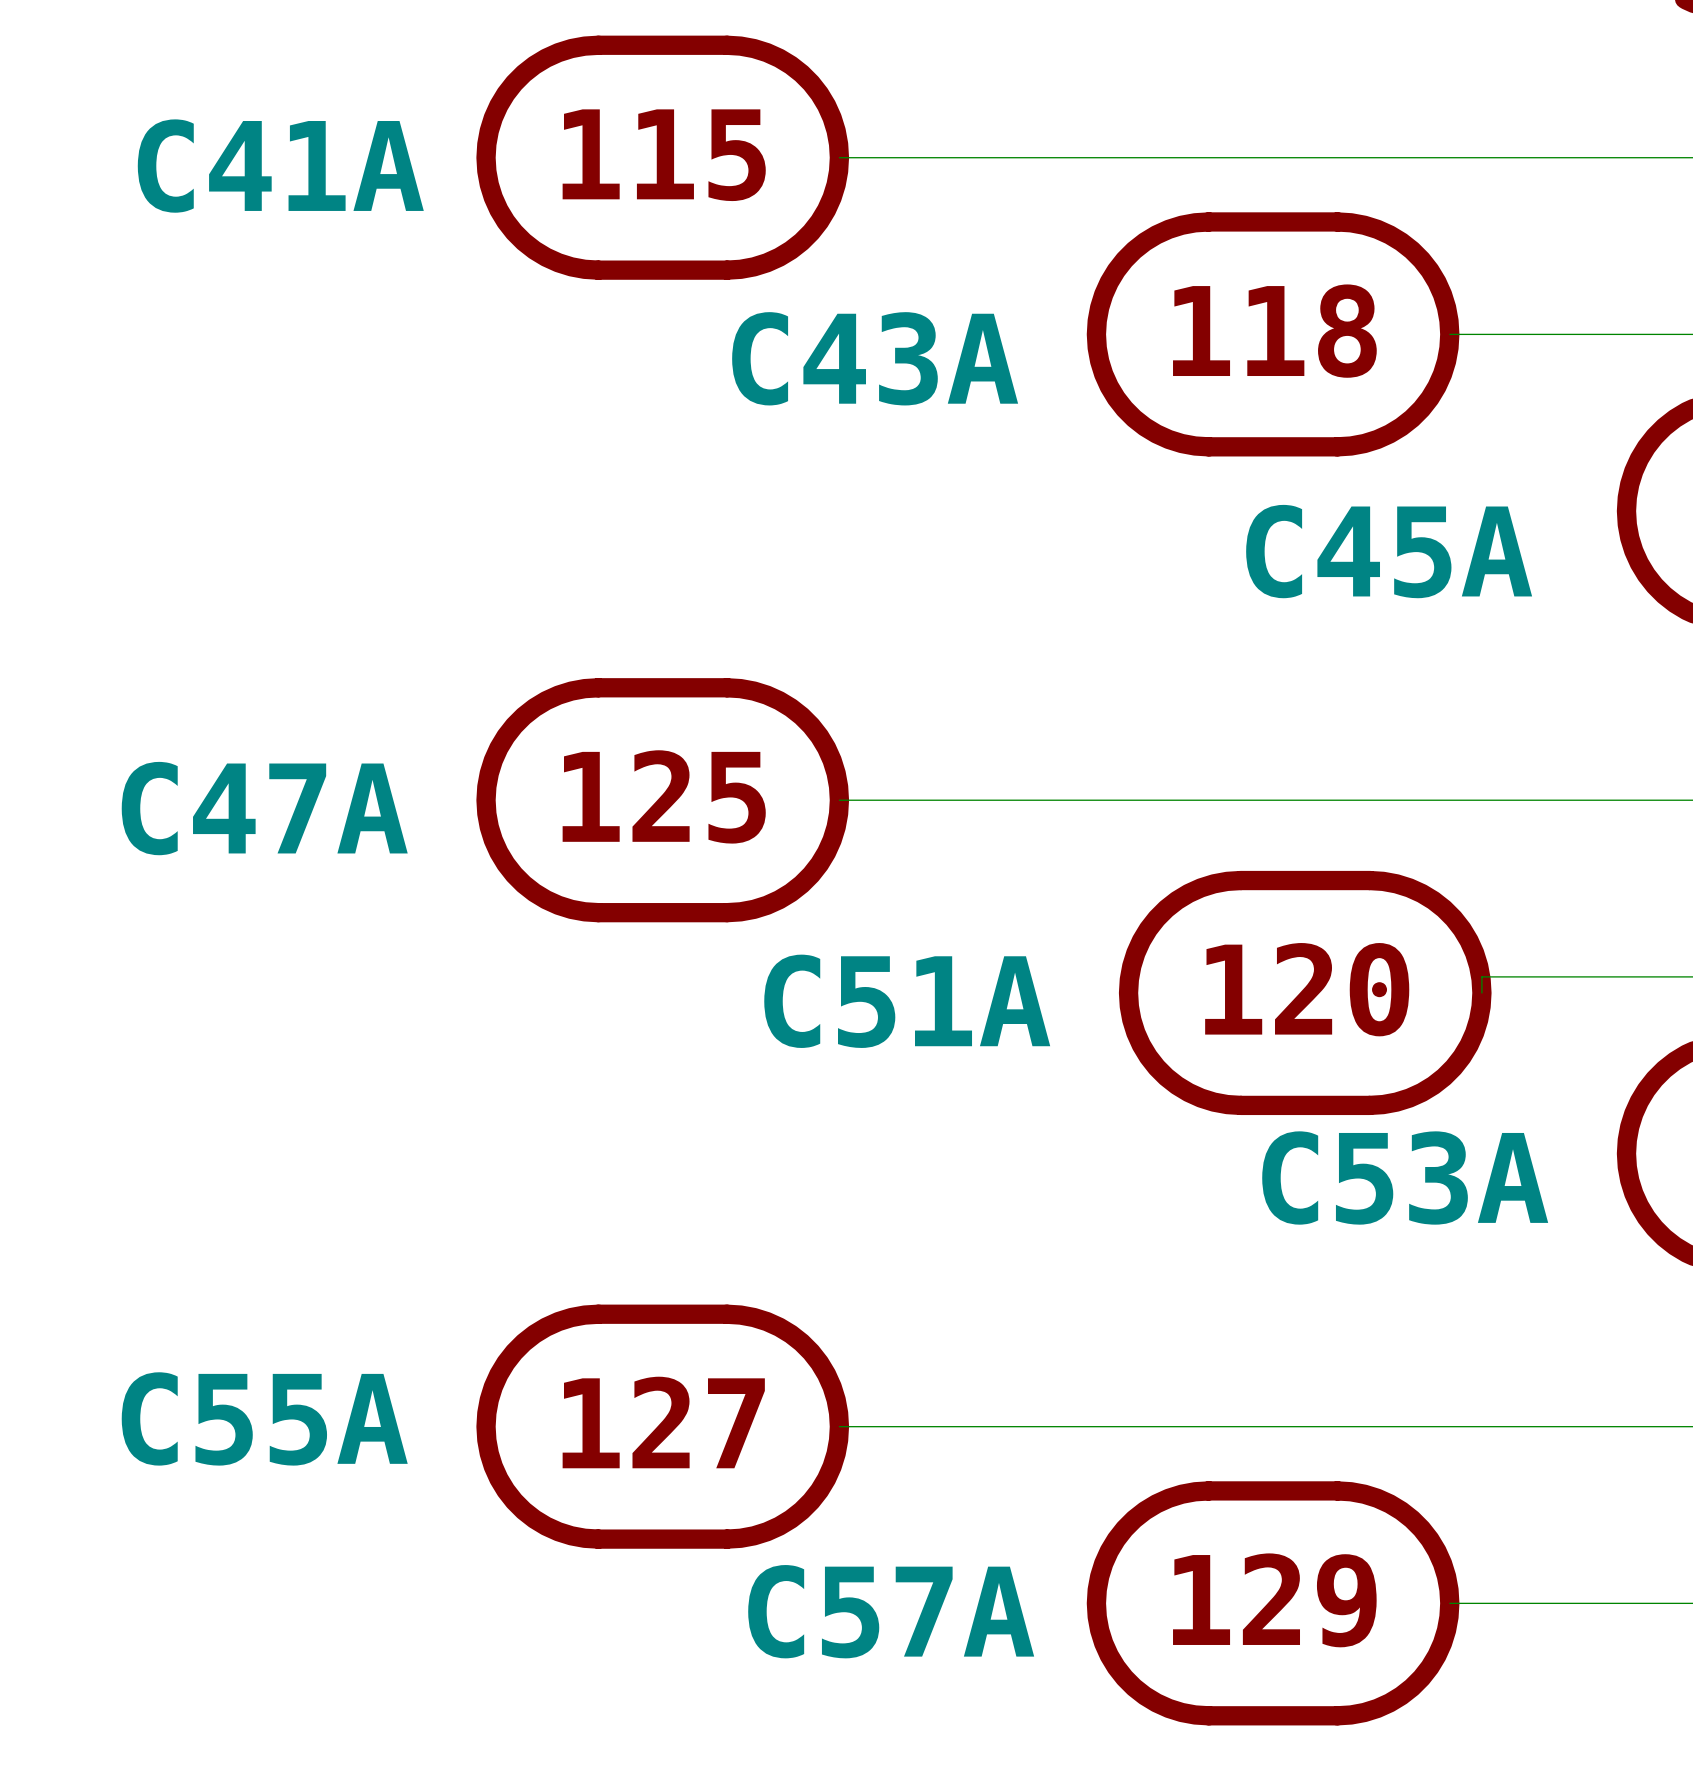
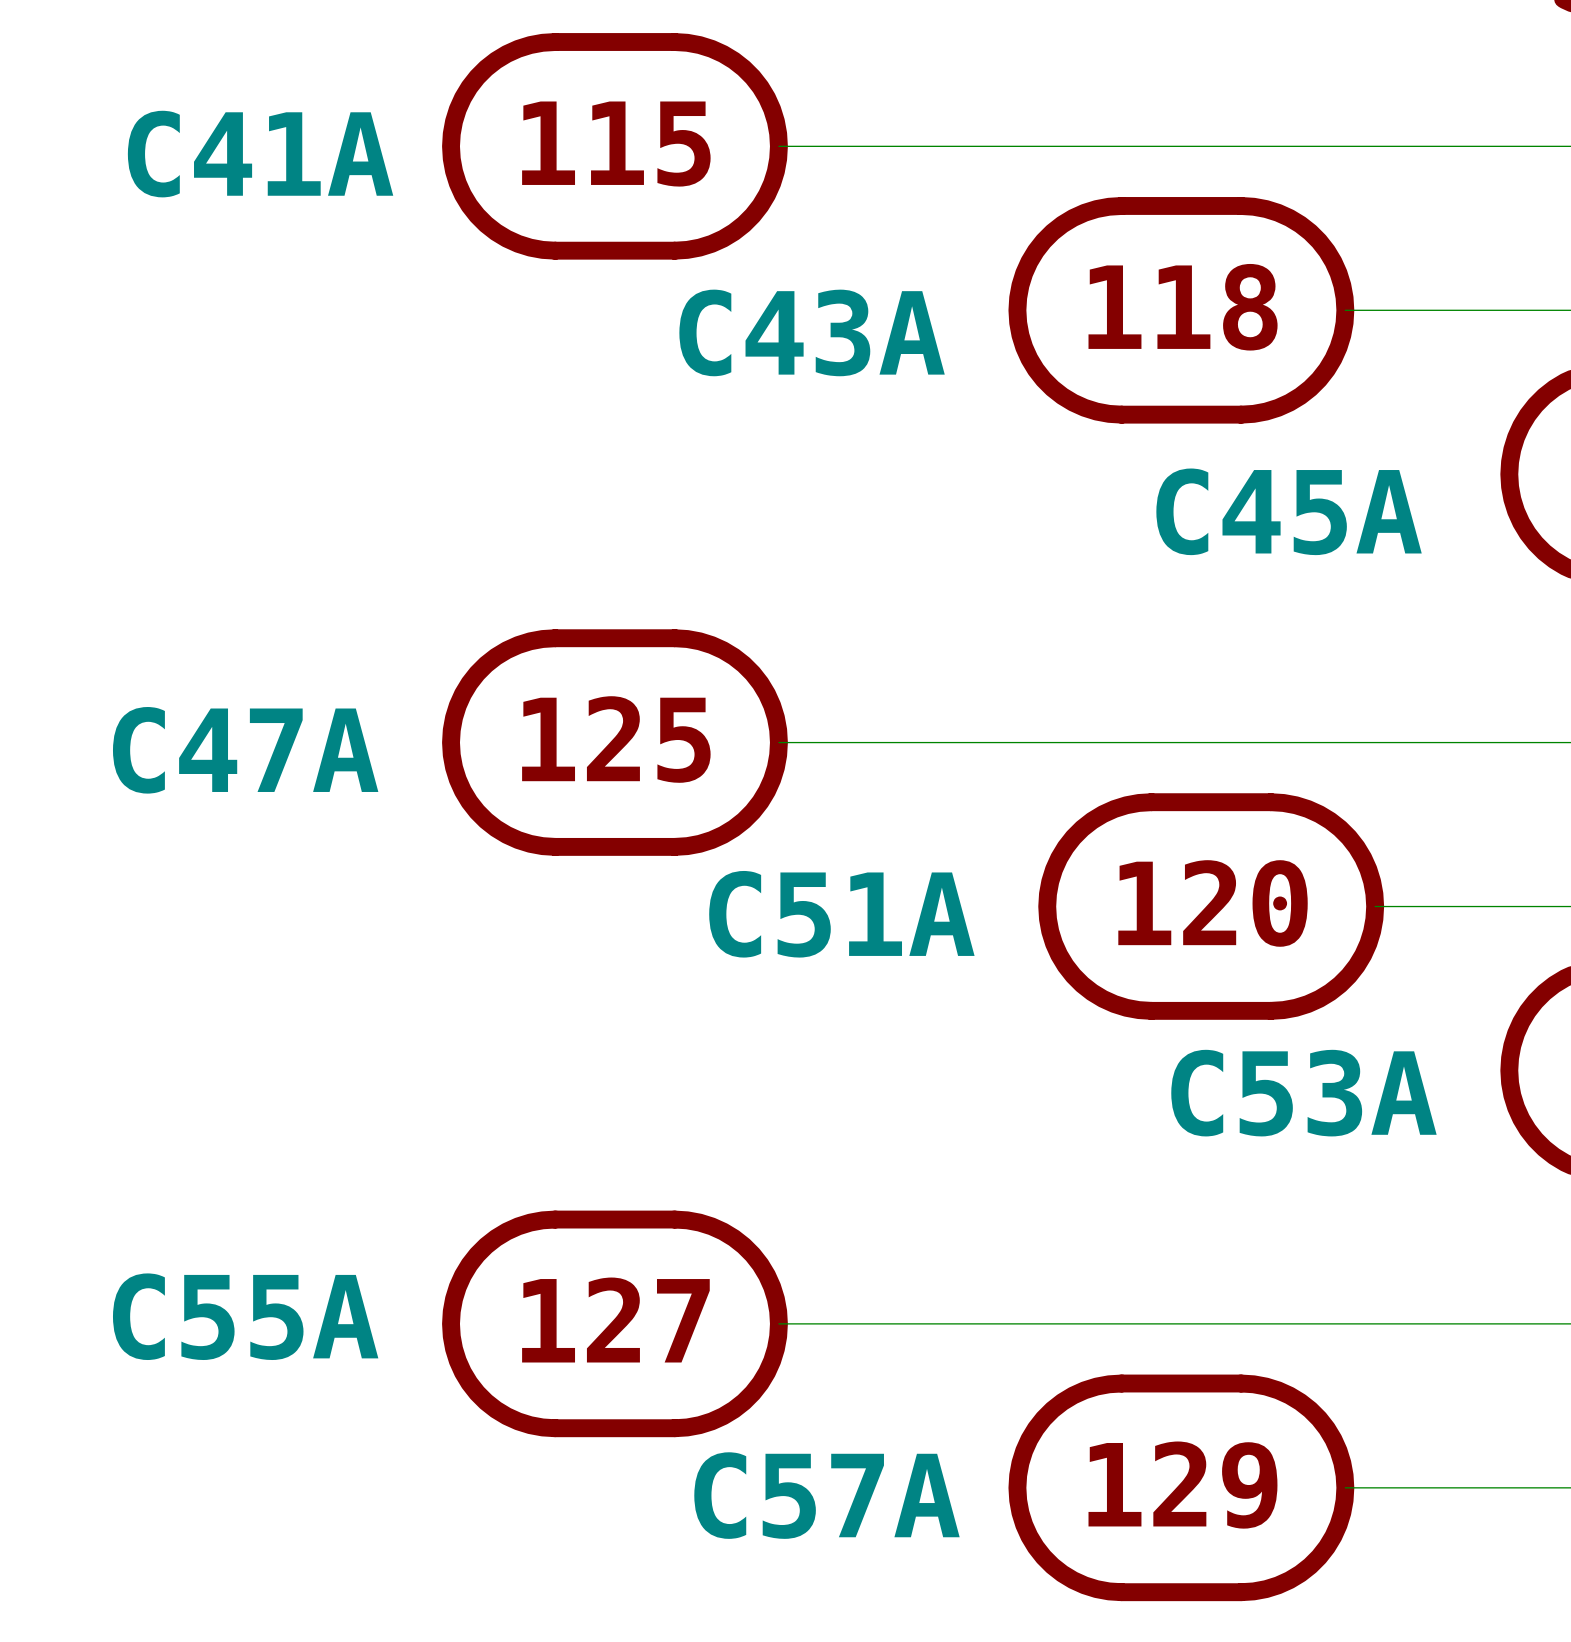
part position: (1305, 992) -> (1211, 906)

